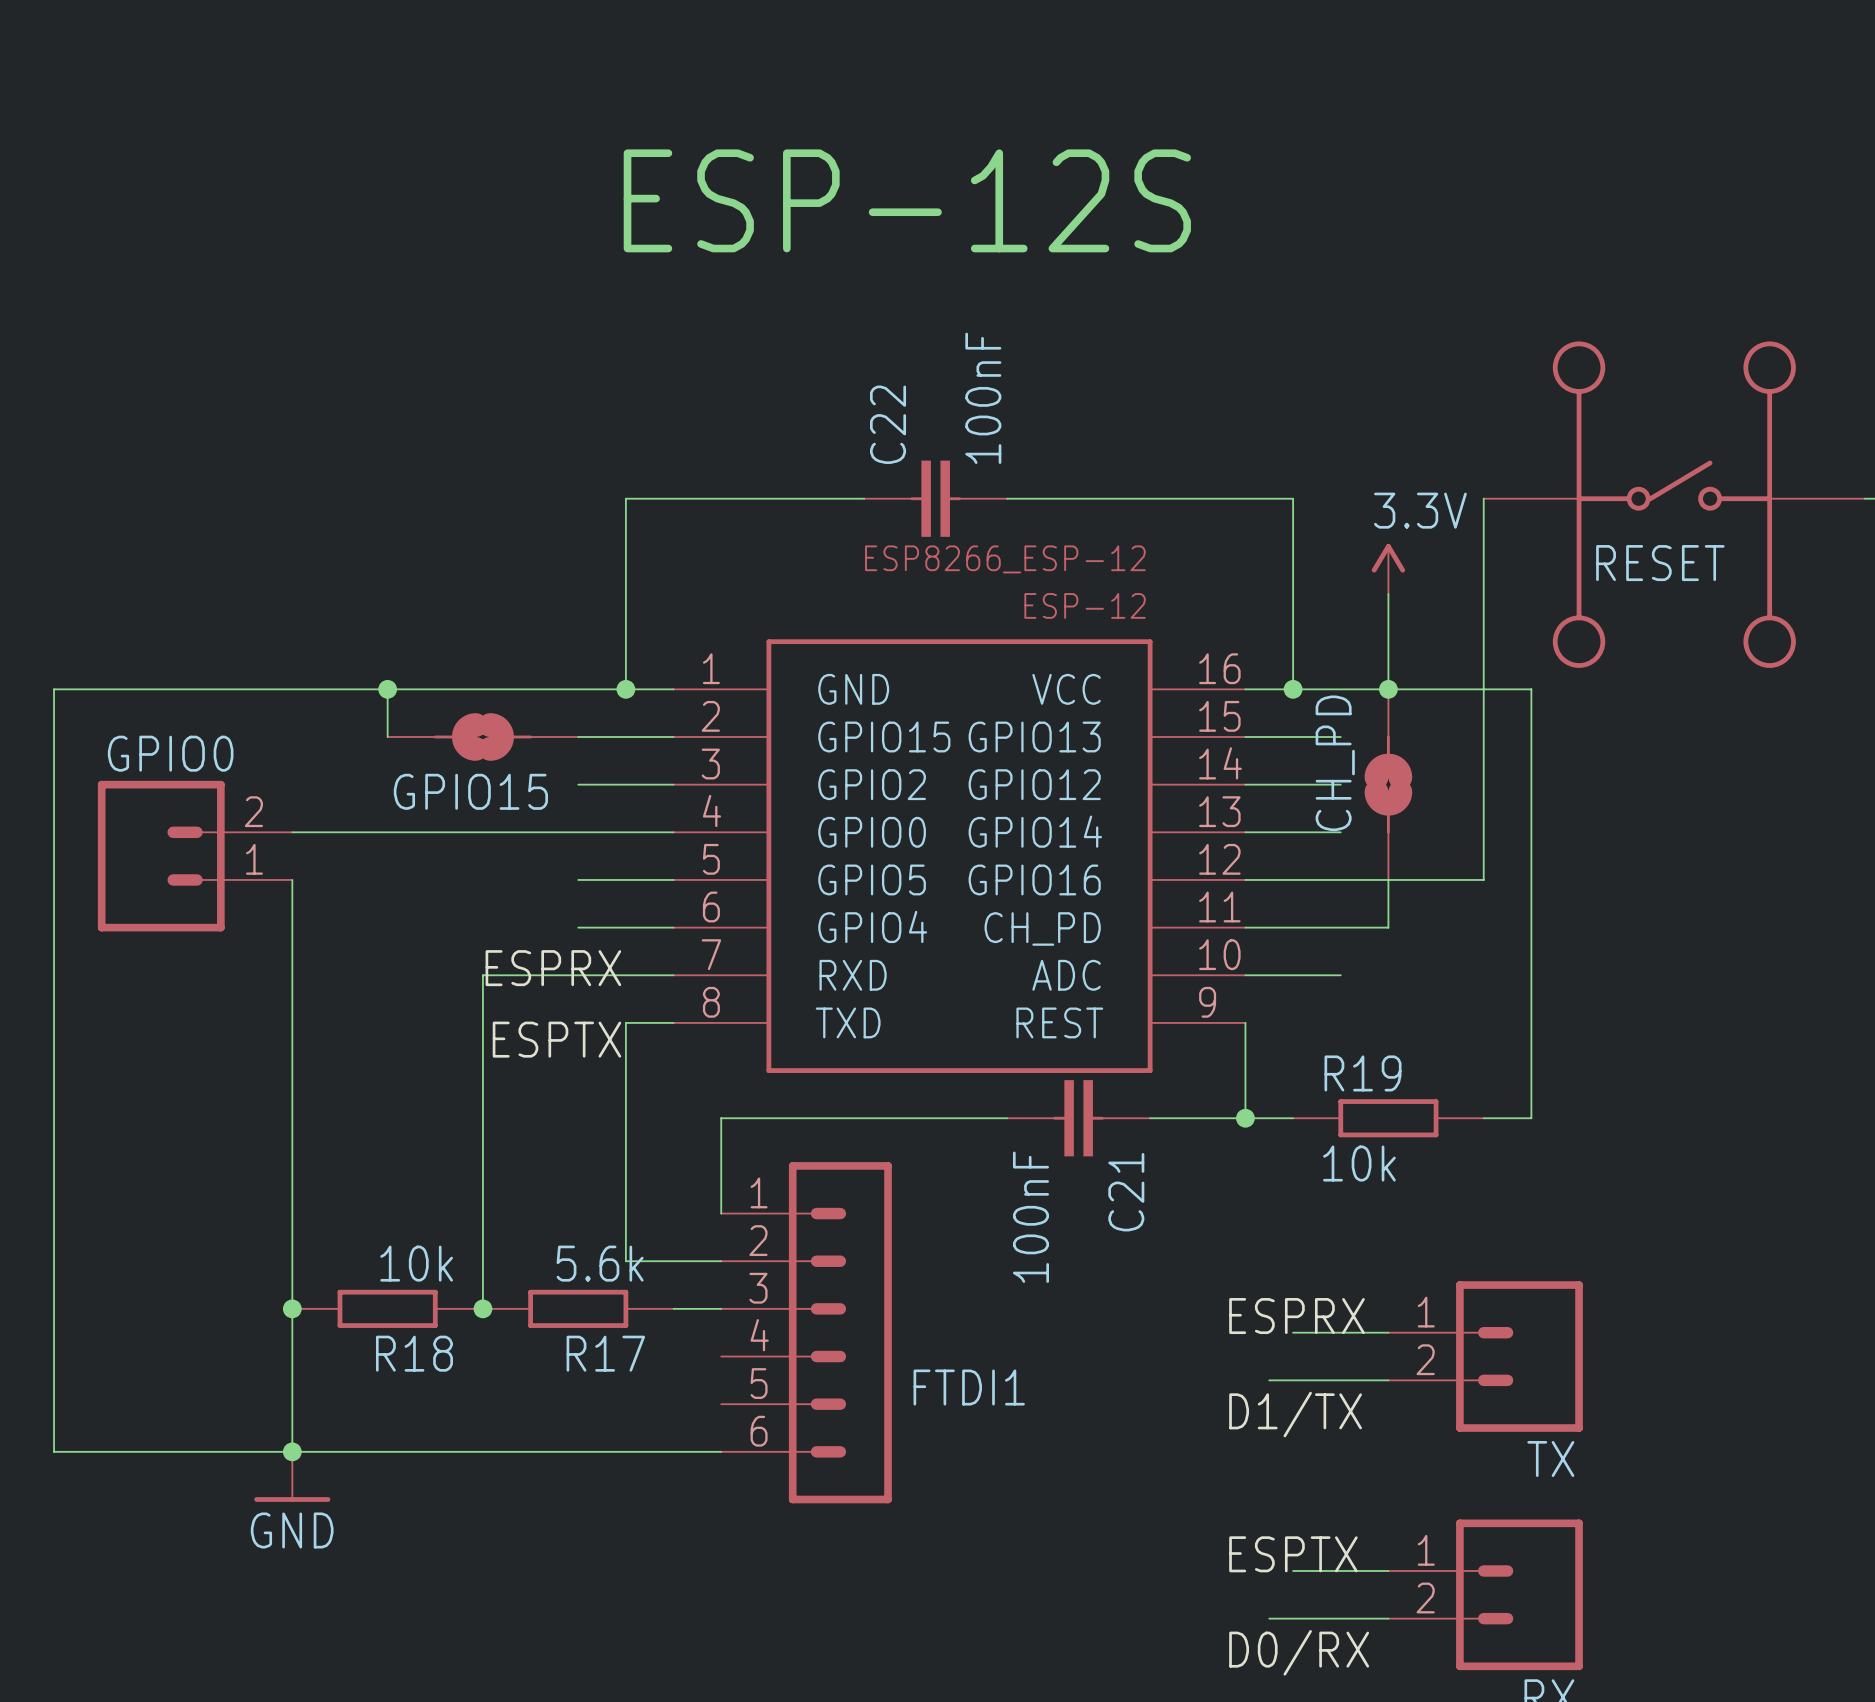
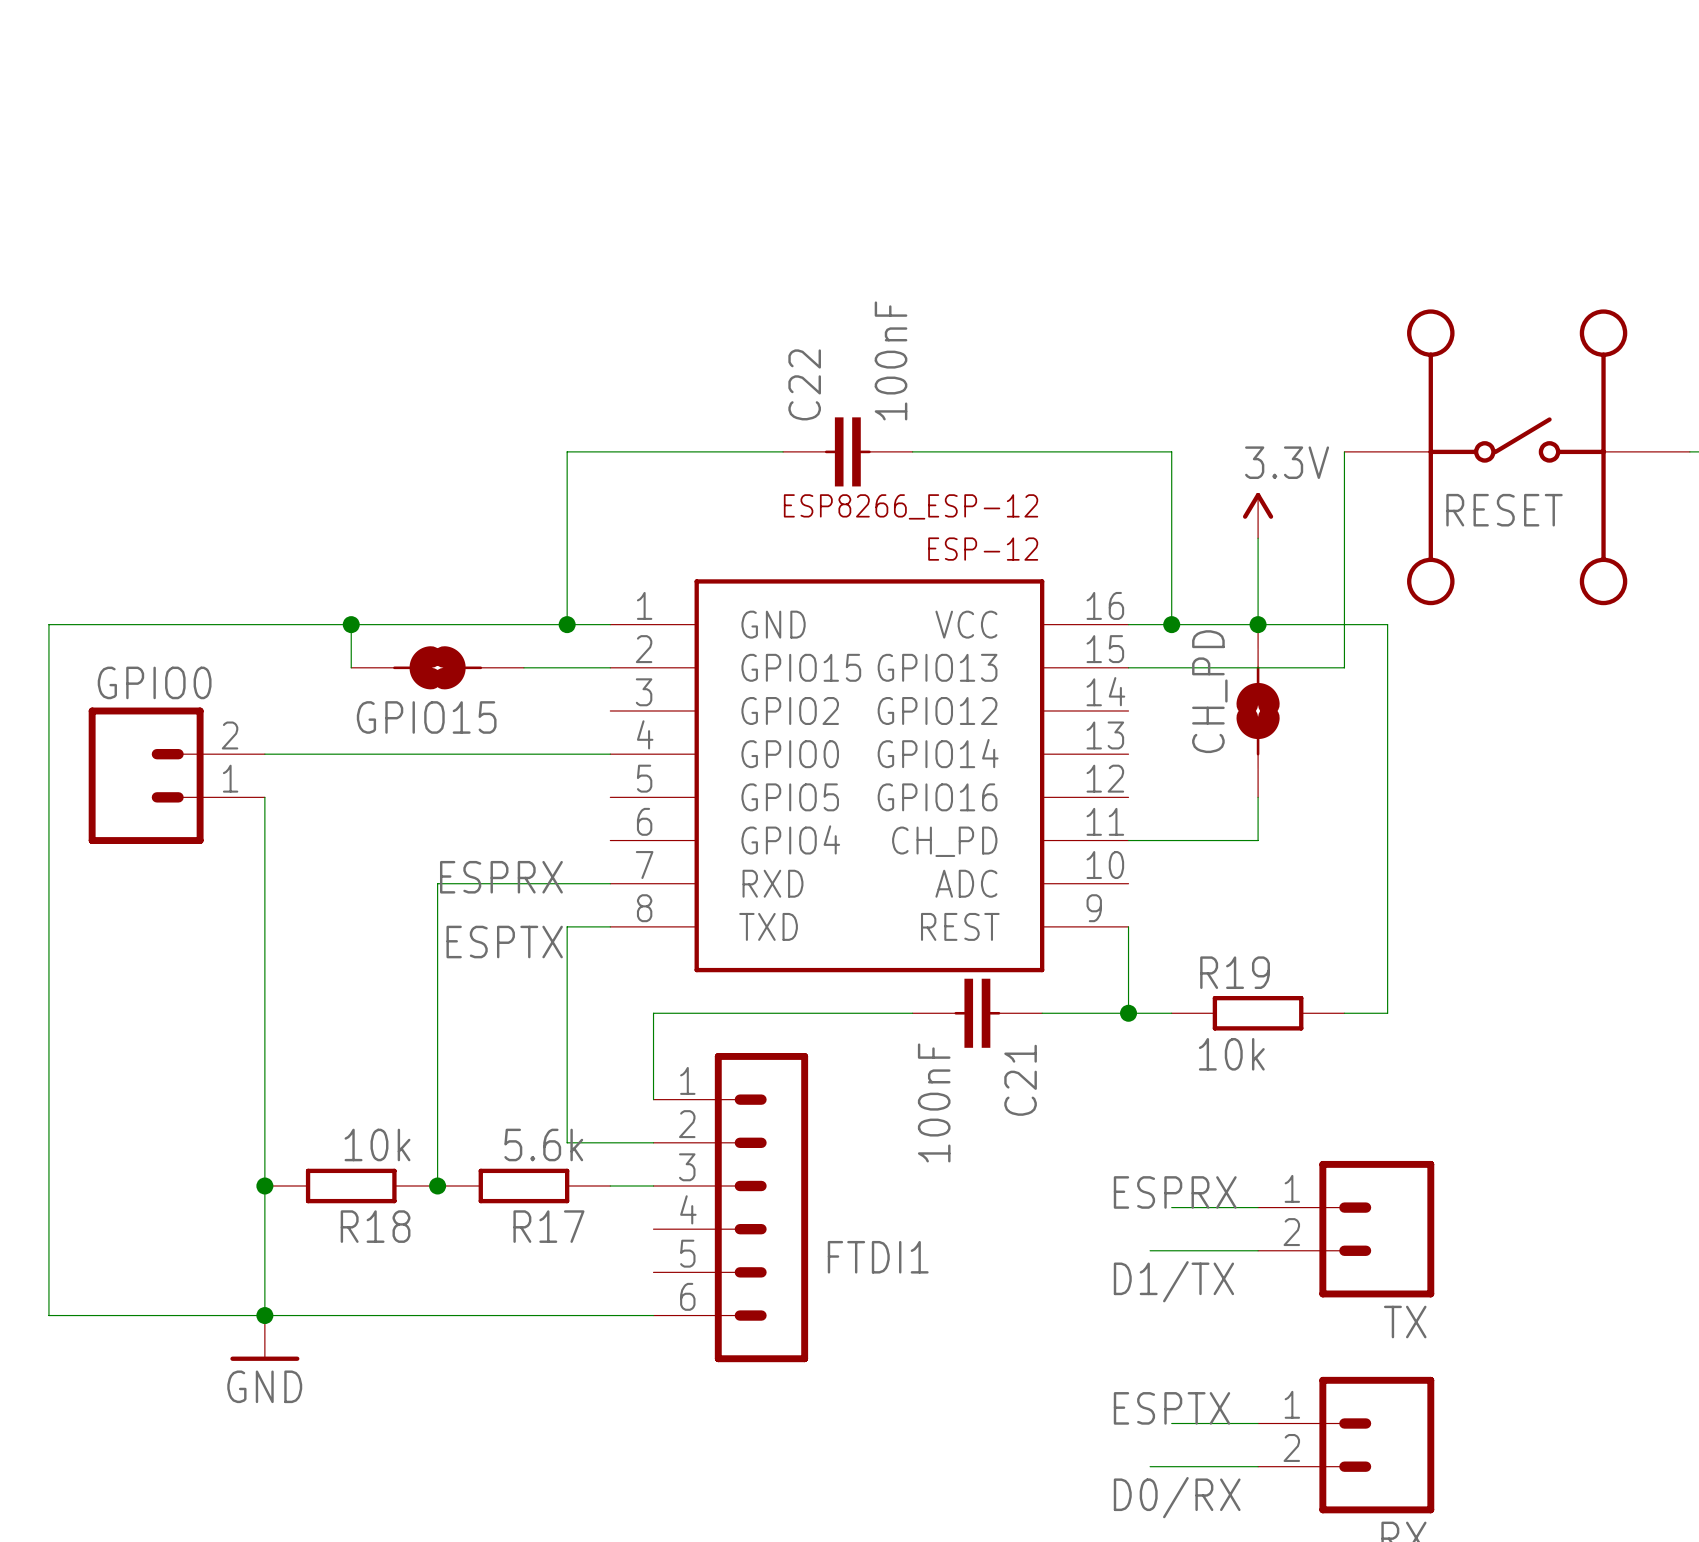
text: ESP-12S (907, 200) -> none
wire: (1483, 737) (1483, 879) (1245, 879) -> (1344, 667) (1214, 667)
wire: (578, 784) (673, 784) -> none
wire: (1245, 784) (1340, 784) -> none
wire: (1245, 832) (1340, 832) -> none
wire: (578, 879) (673, 879) -> none
wire: (578, 927) (673, 927) -> none
wire: (1245, 975) (1340, 975) -> none

